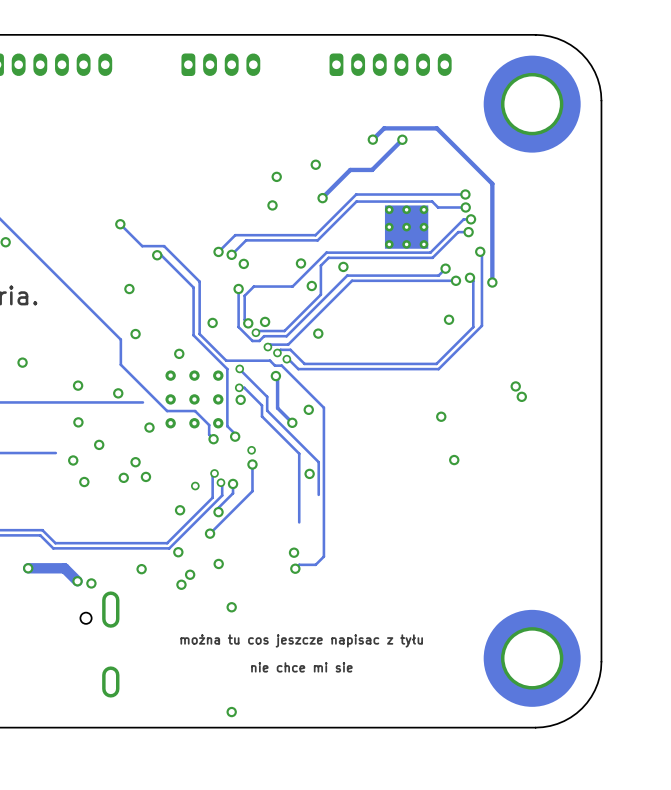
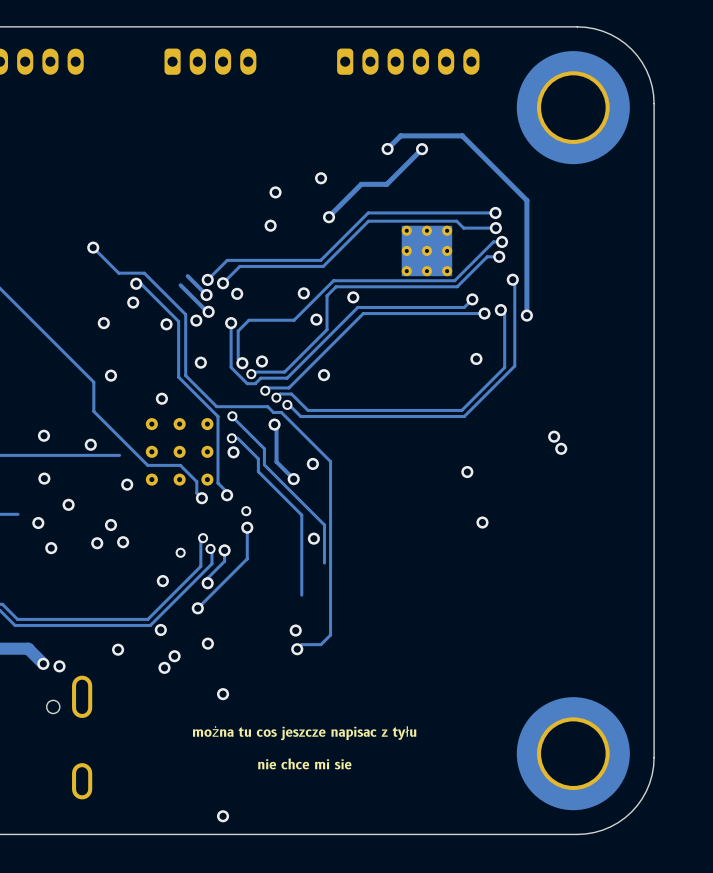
track: none -> (187, 276) (206, 295)
track: none -> (180, 285) (208, 311)
via: none -> (206, 295)
via: none -> (133, 302)
via: none -> (208, 311)
via: none -> (196, 320)
via: none -> (166, 324)

